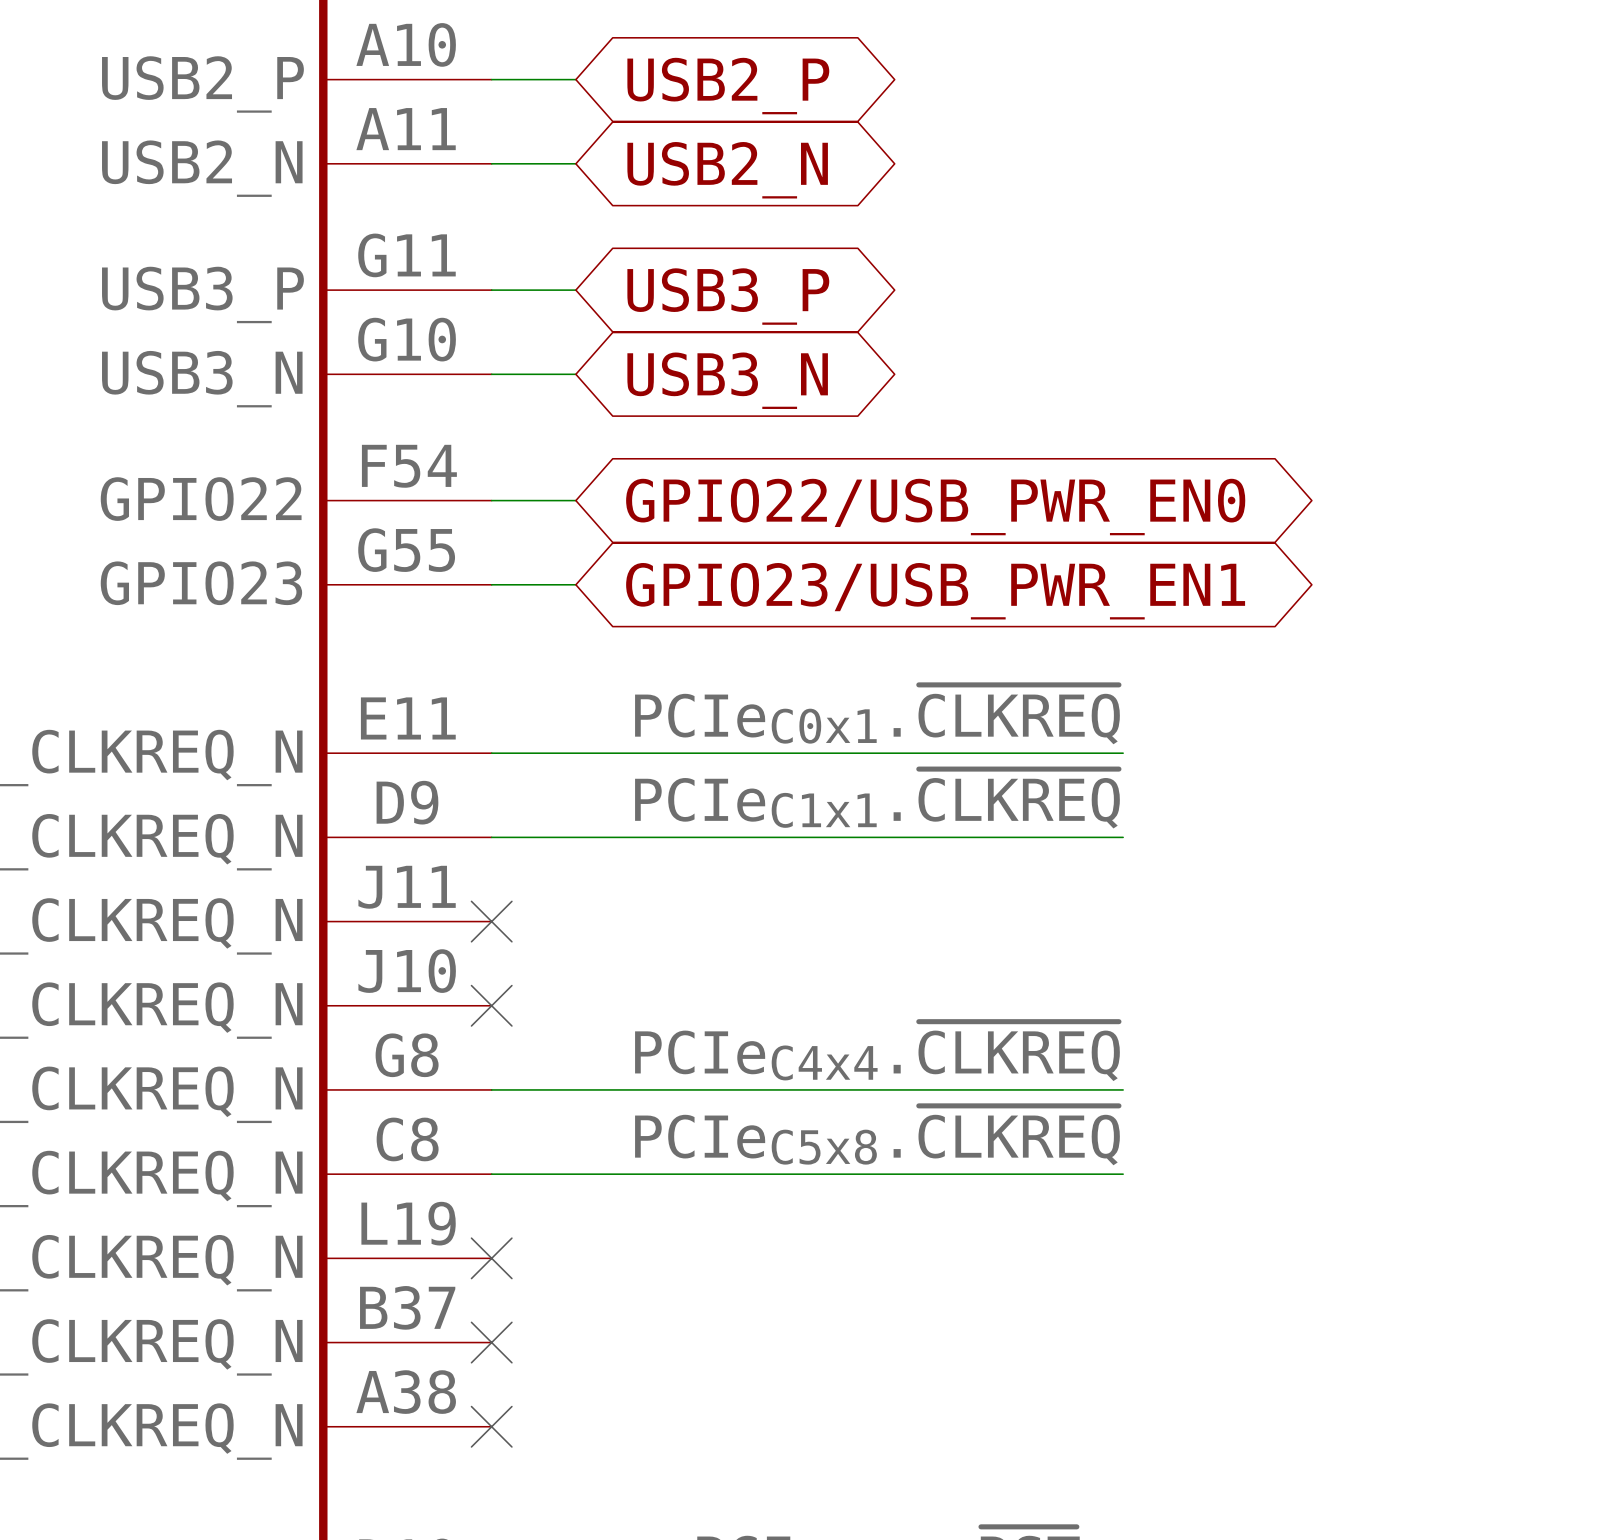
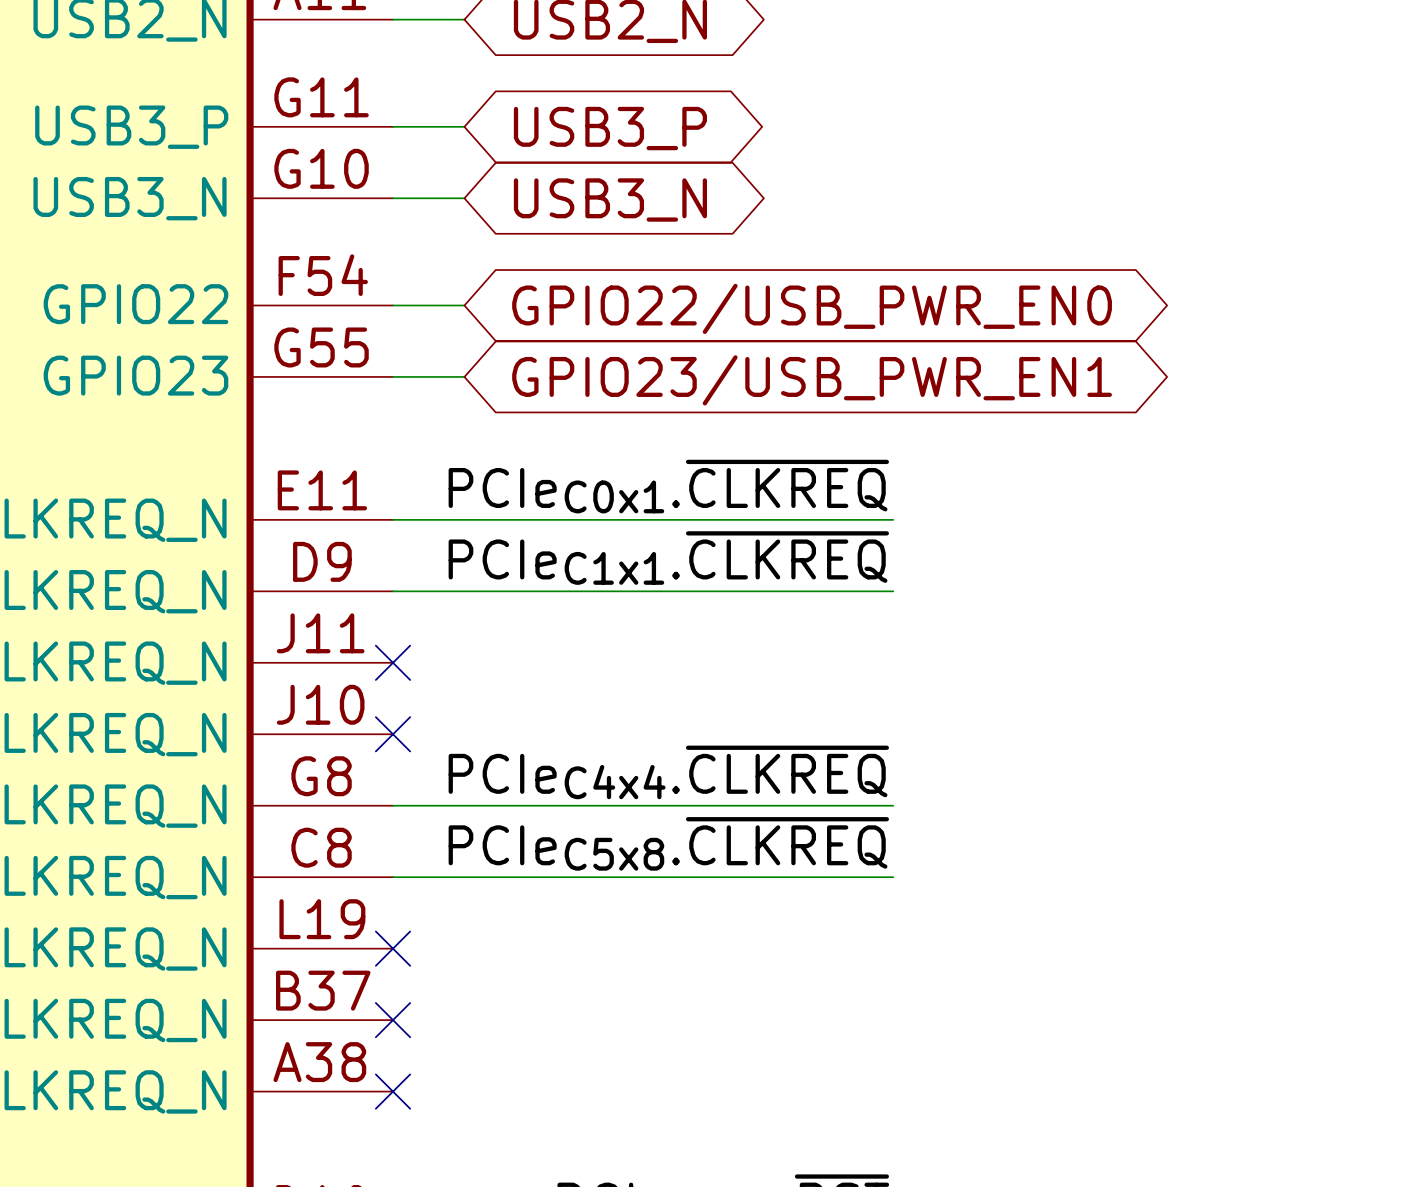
label position: PCIeC0x1.~{CLKREQ} (877, 714) -> PCIeC0x1.~{CLKREQ} (668, 486)
wire: (1081, 753) (1123, 753) -> none
label position: PCIeC1x1.~{CLKREQ} (877, 798) -> PCIeC1x1.~{CLKREQ} (668, 558)
wire: (1081, 837) (1123, 837) -> none
label position: PCIeC4x4.~{CLKREQ} (877, 1051) -> PCIeC4x4.~{CLKREQ} (668, 772)
wire: (1081, 1089) (1123, 1089) -> none
label position: PCIeC5x8.~{CLKREQ} (877, 1135) -> PCIeC5x8.~{CLKREQ} (668, 843)
wire: (1081, 1174) (1123, 1174) -> none

